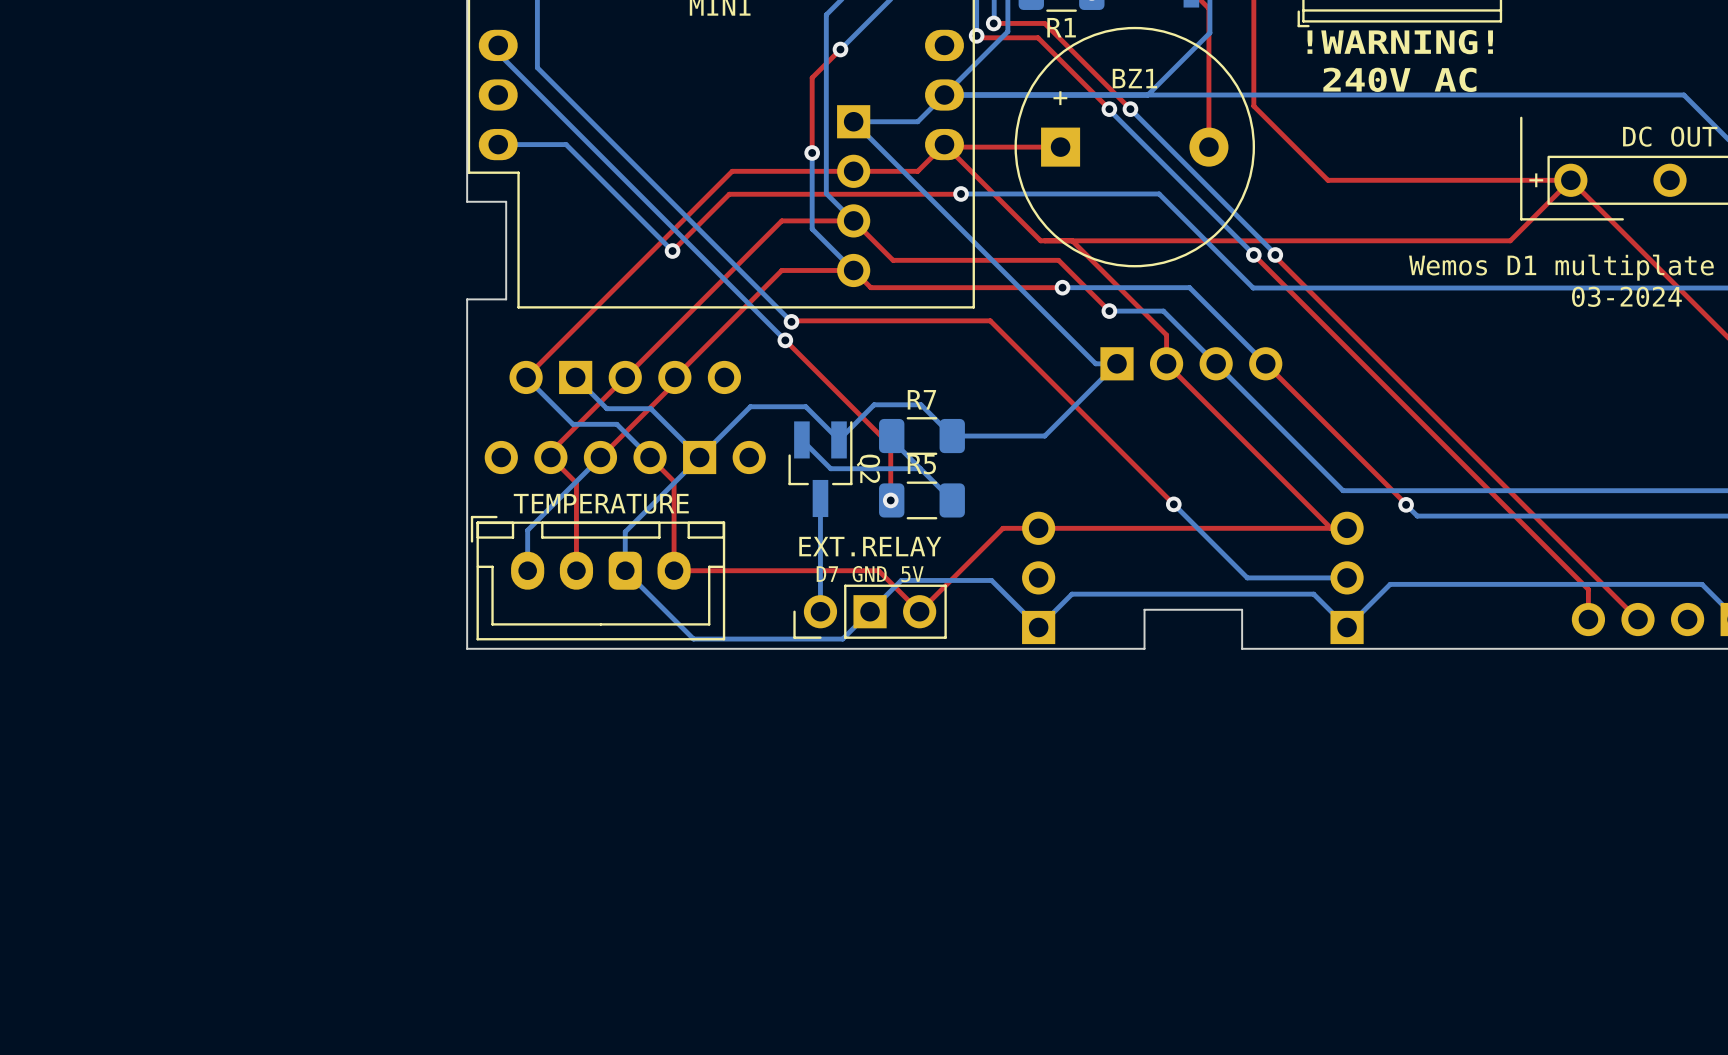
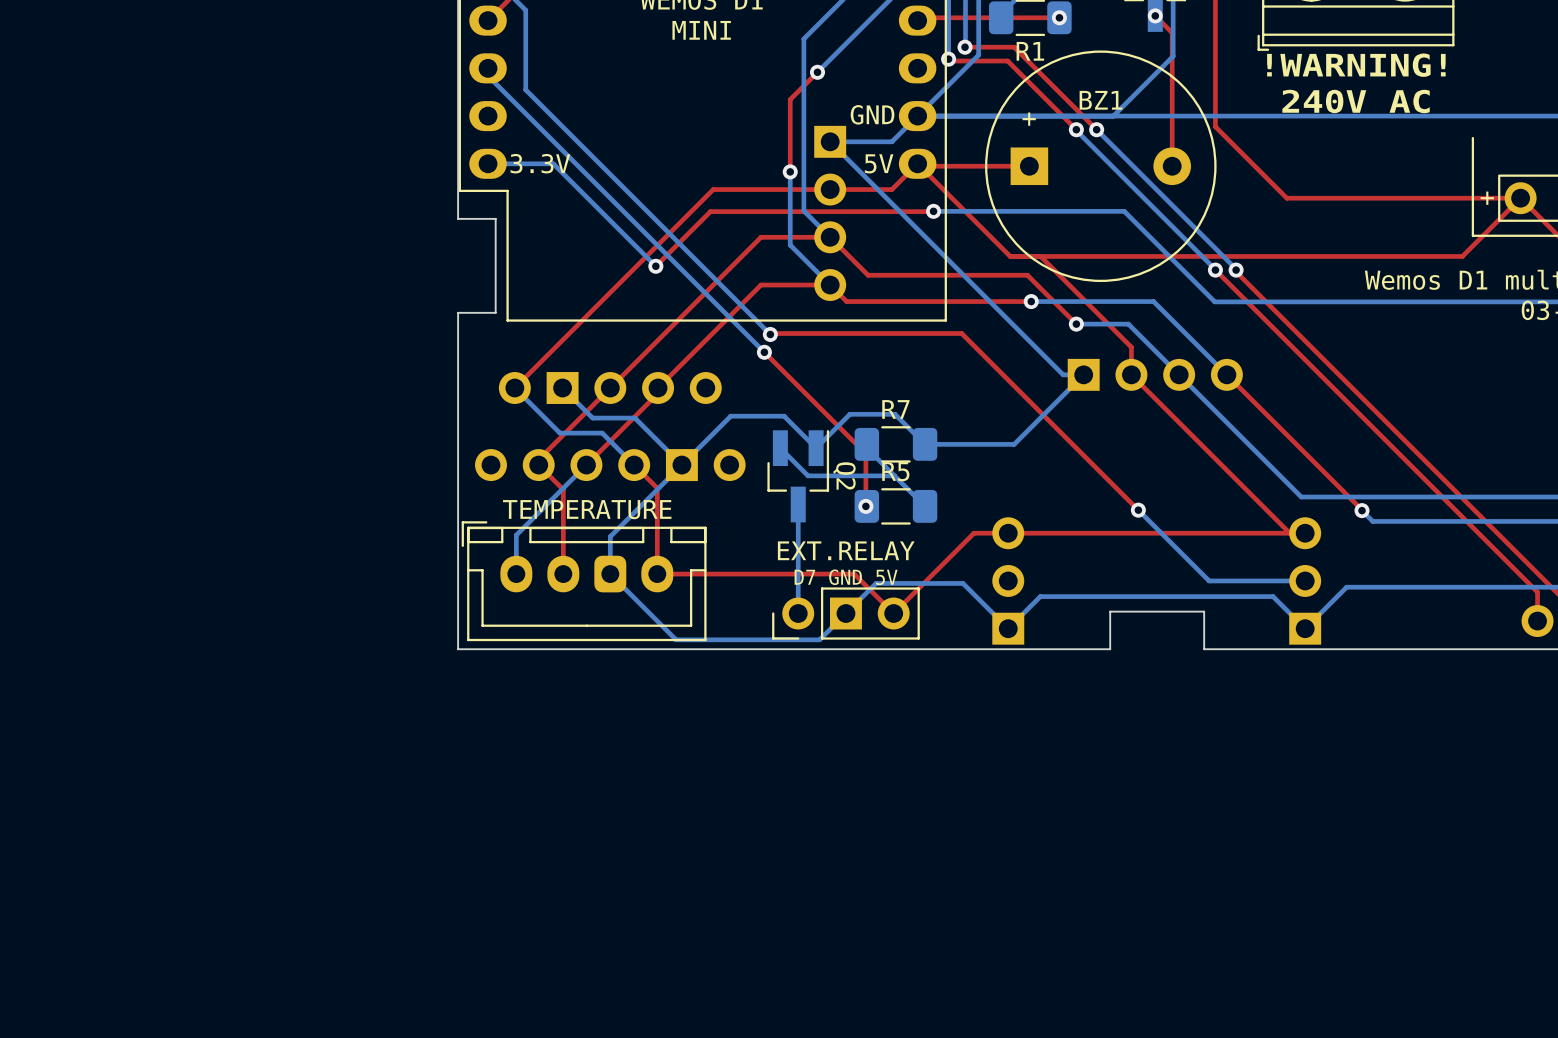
text: none -> GND (872, 114)
text: none -> 3.3V (540, 163)
text: none -> 5V (879, 163)

